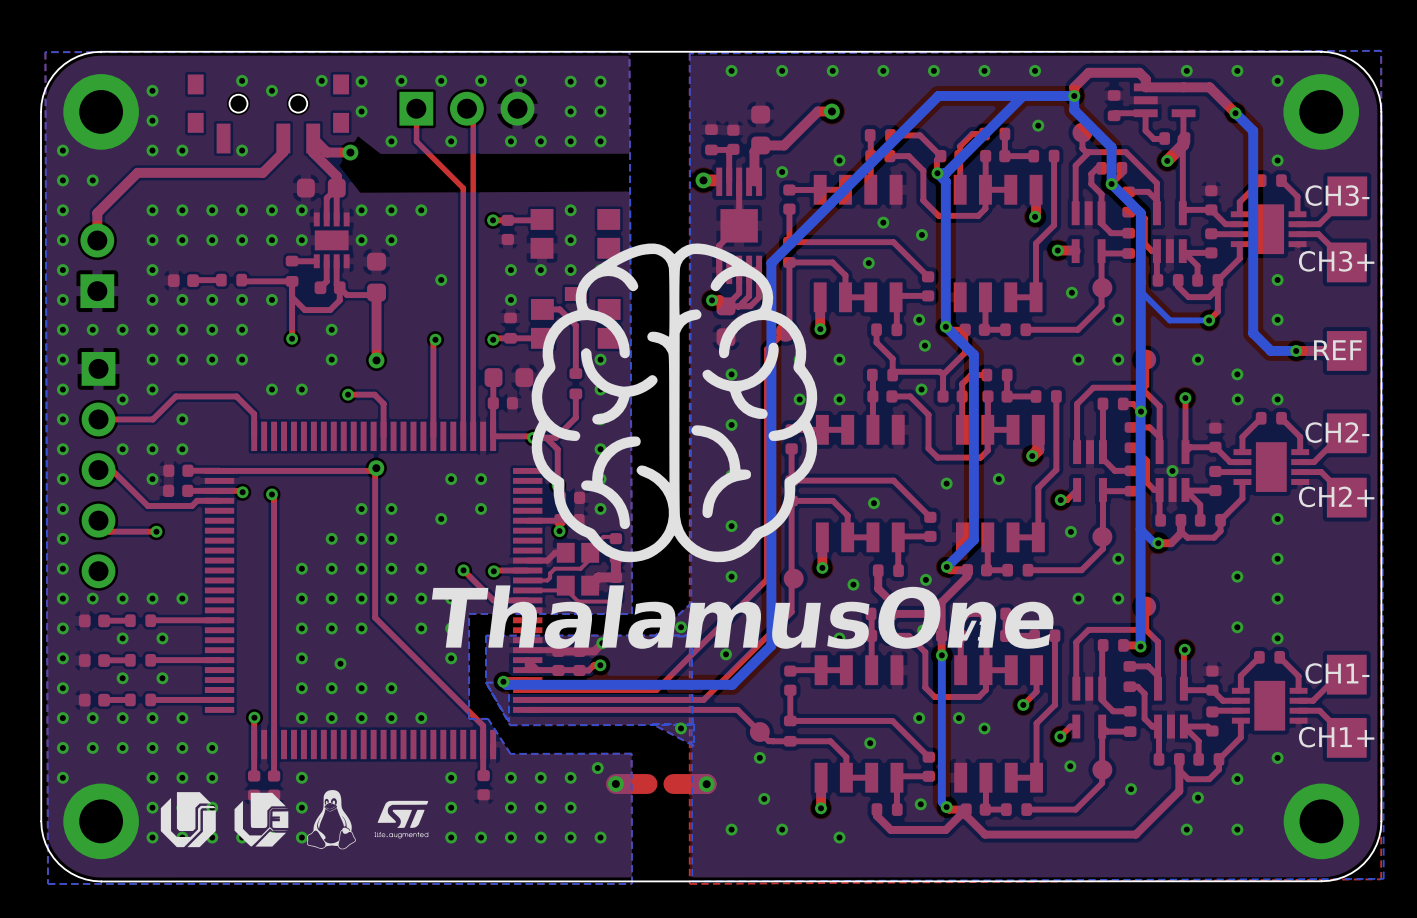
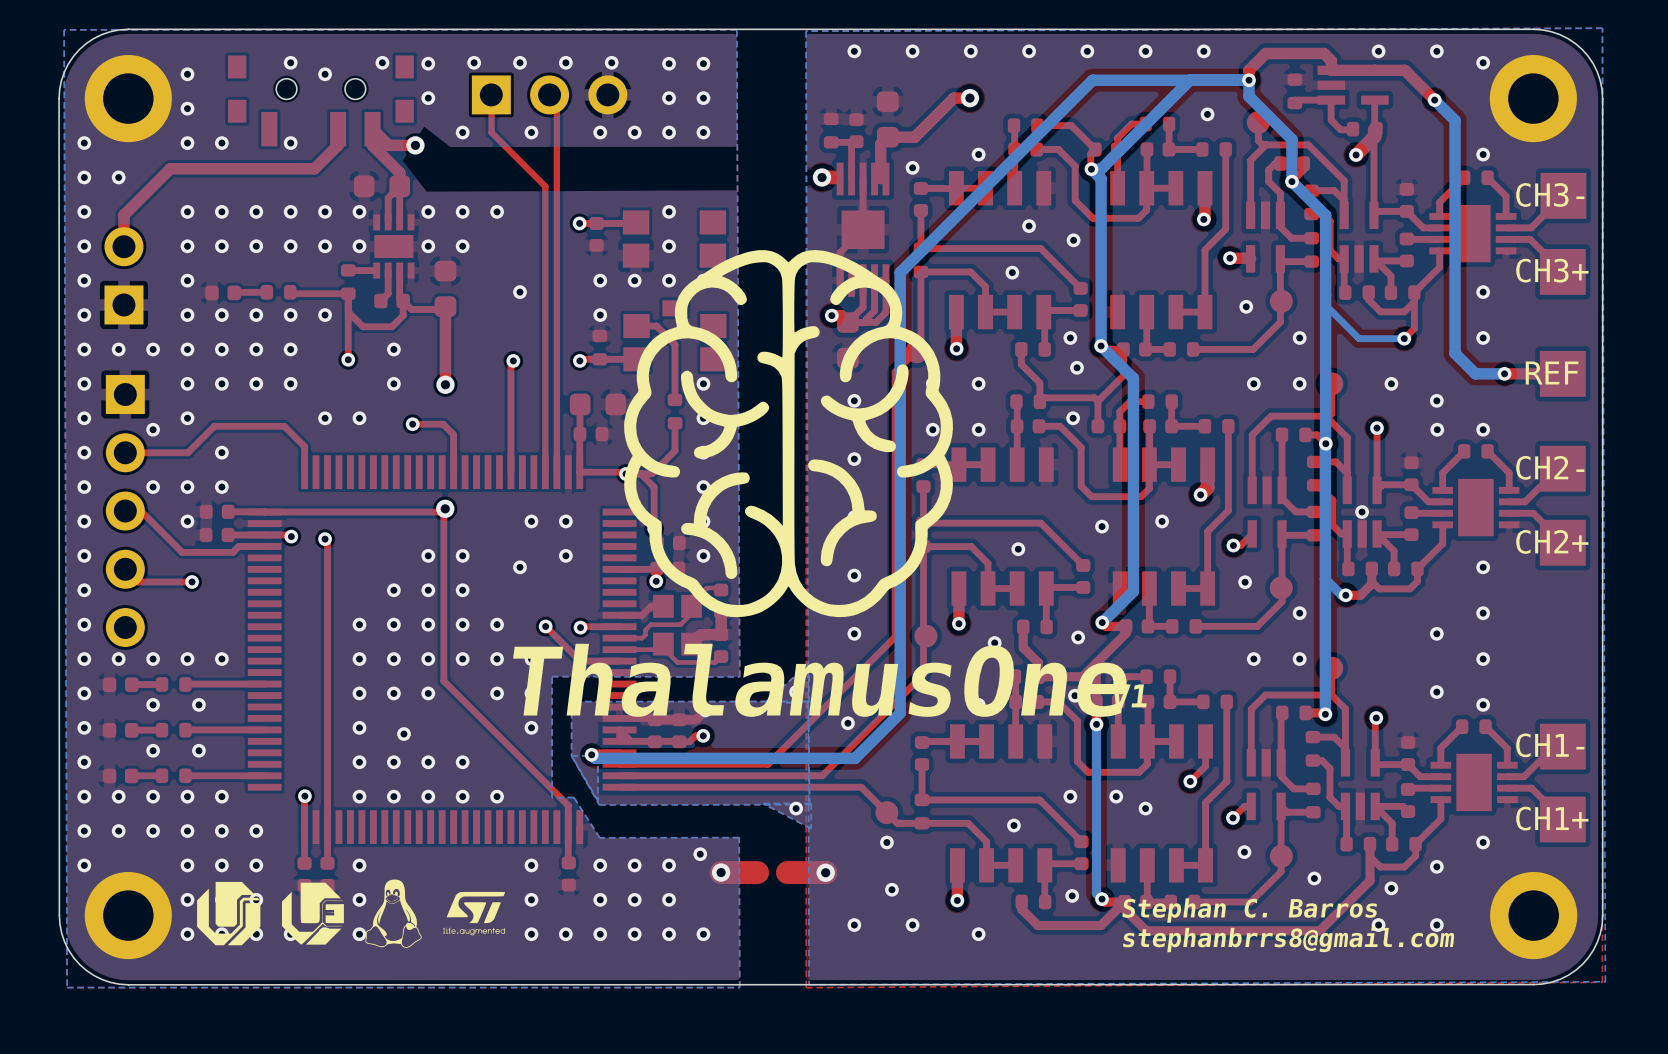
text: none -> Stephan C. Barros (1249, 910)
text: none -> stephanbrrs8@gmail.com (1288, 939)

